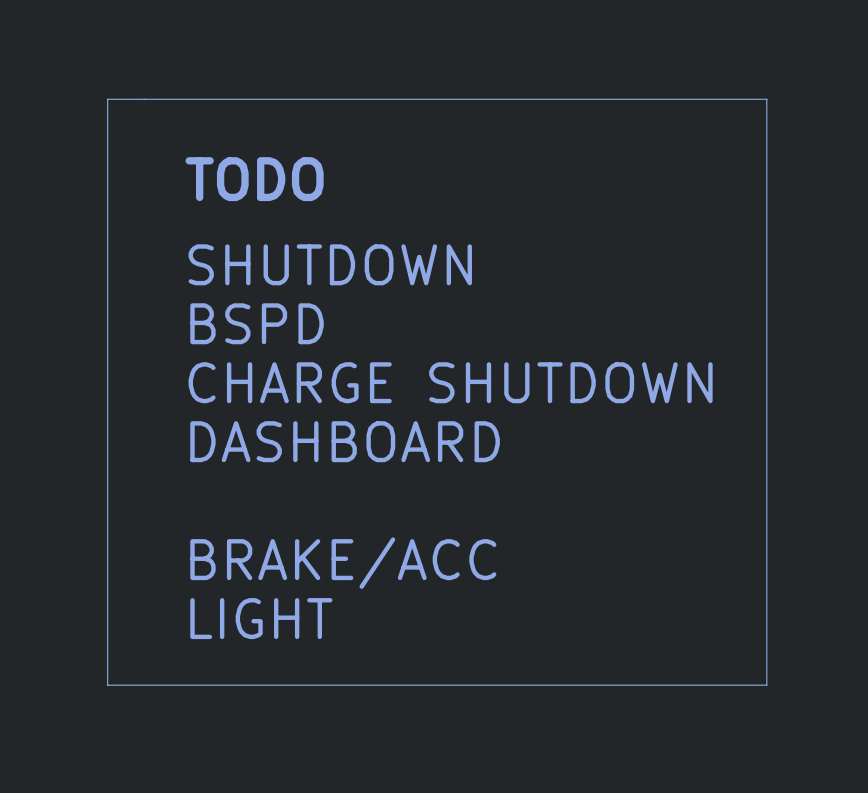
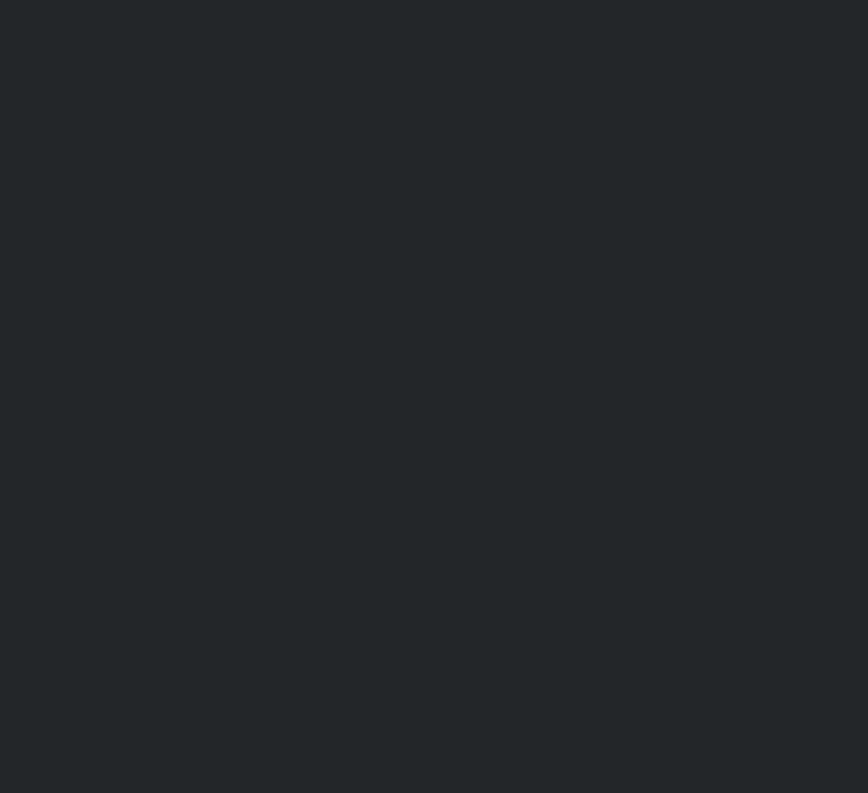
line: (107, 99) (766, 99) (766, 685) (107, 685) (107, 99) -> none
text: TODO (254, 179) -> none
text: SHUTDOWN (330, 264) -> none
text: BSPD (257, 323) -> none
text: CHARGE SHUTDOWN (450, 382) -> none
text: DASHBOARD (345, 441) -> none
text: BRAKE/ACC (343, 563) -> none
text: LIGHT (261, 618) -> none

